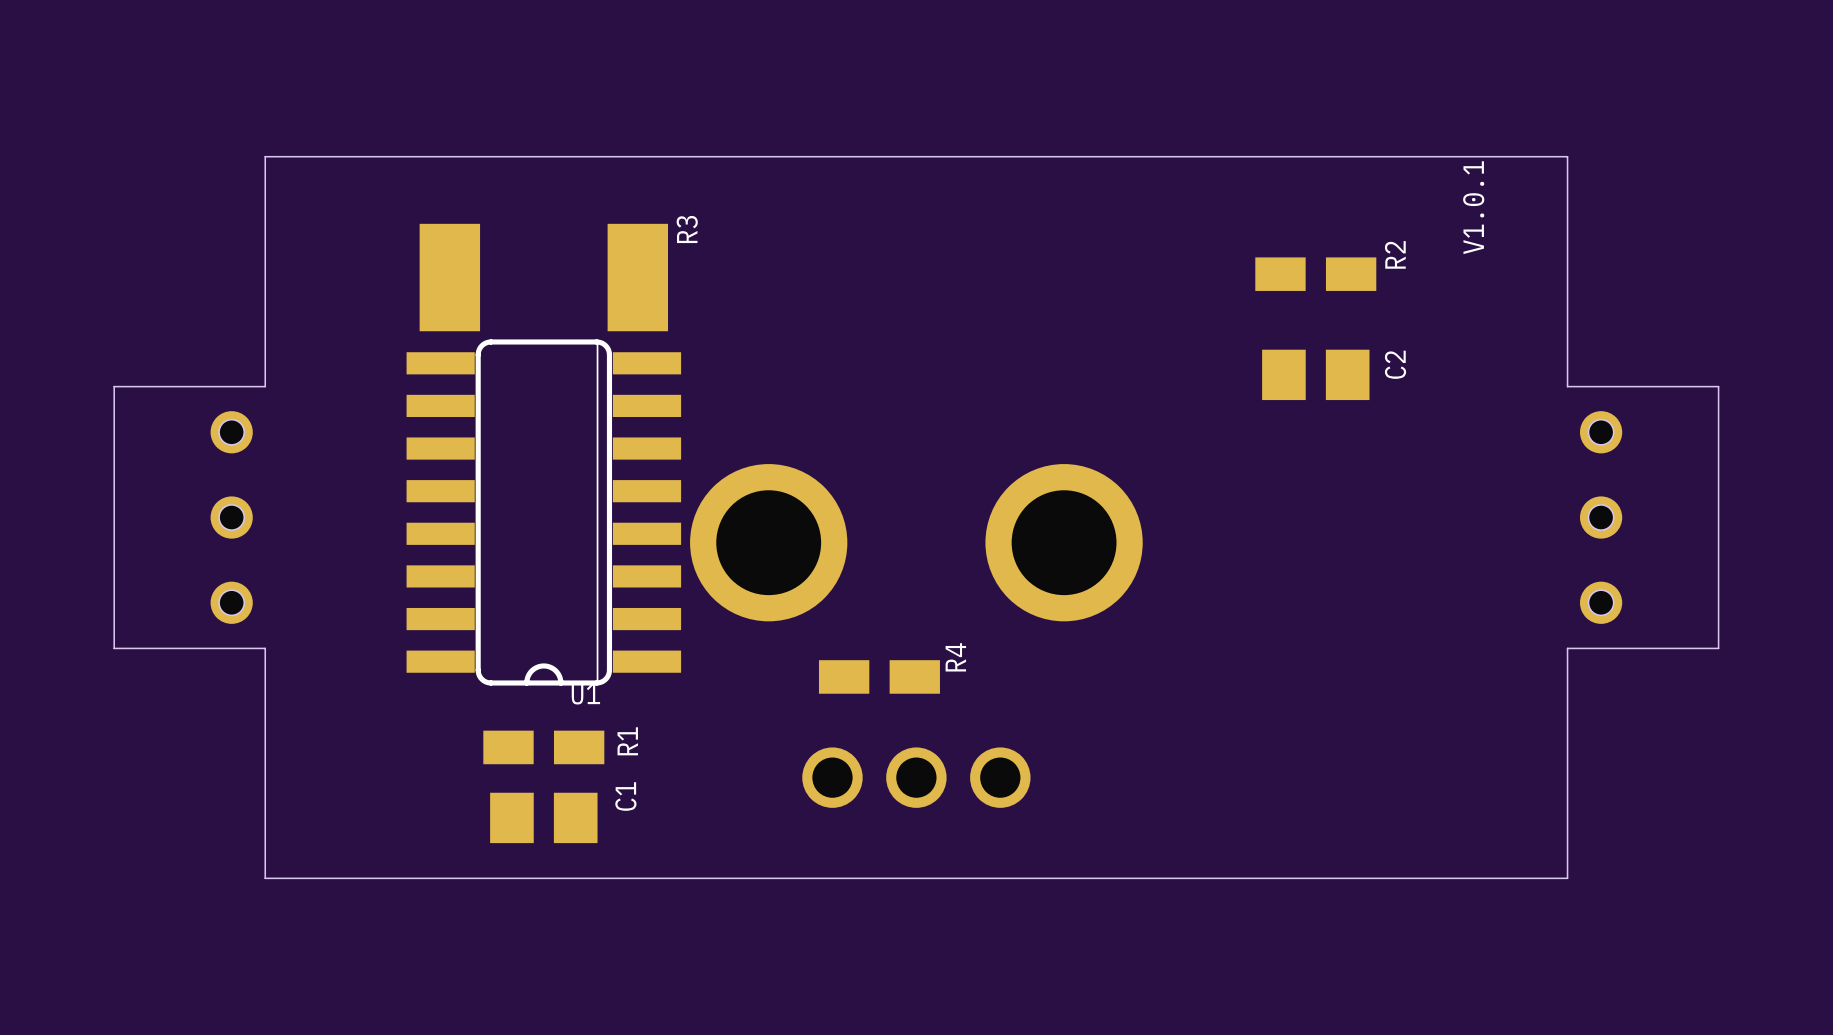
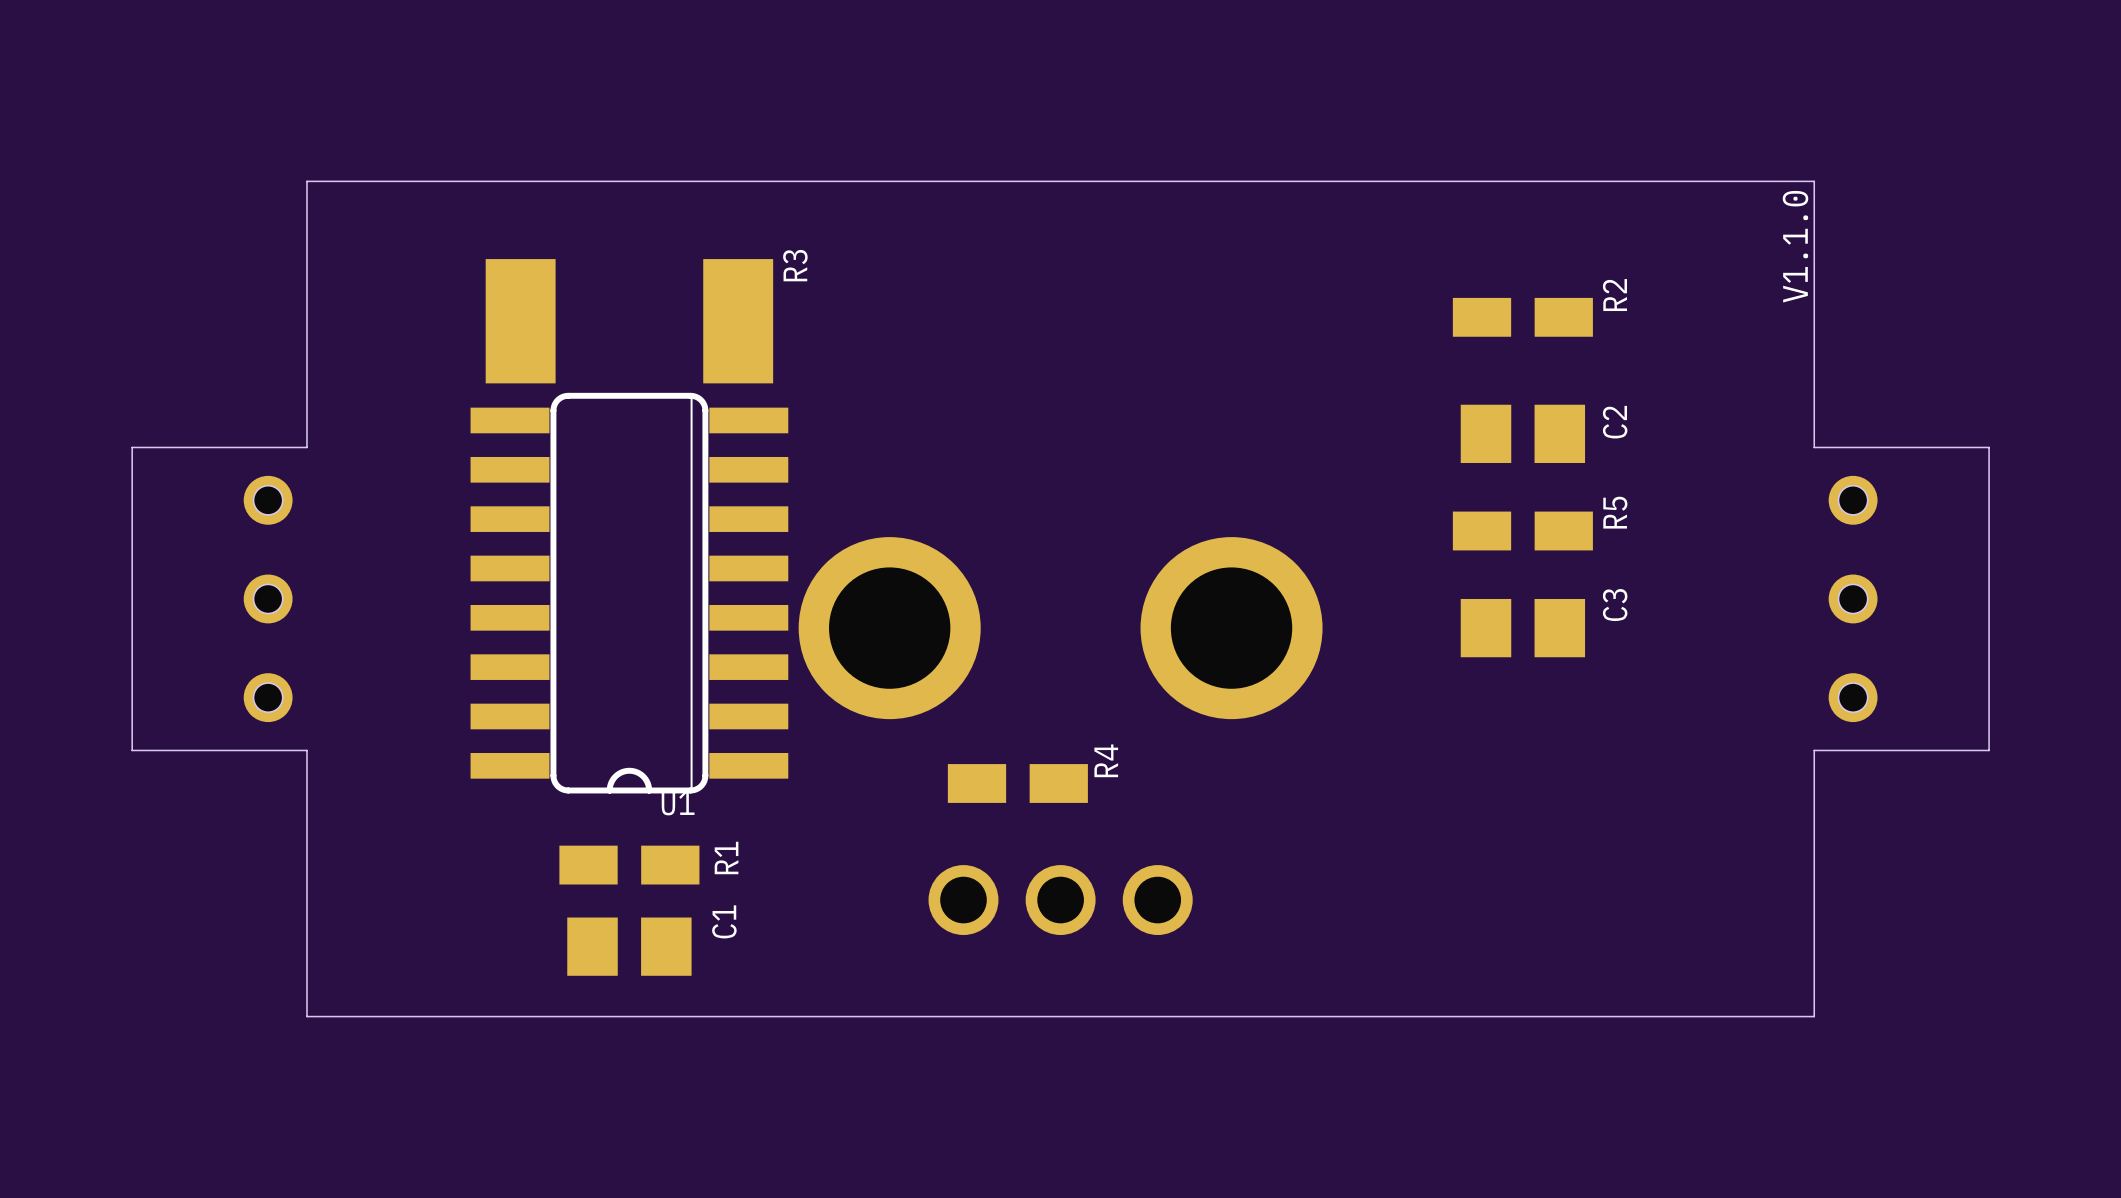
drawing: none -> [1782, 190, 1809, 303]
text: V1.0.1 (1473, 207) -> none
R5: none -> (1522, 530)
C3: none -> (1522, 628)

